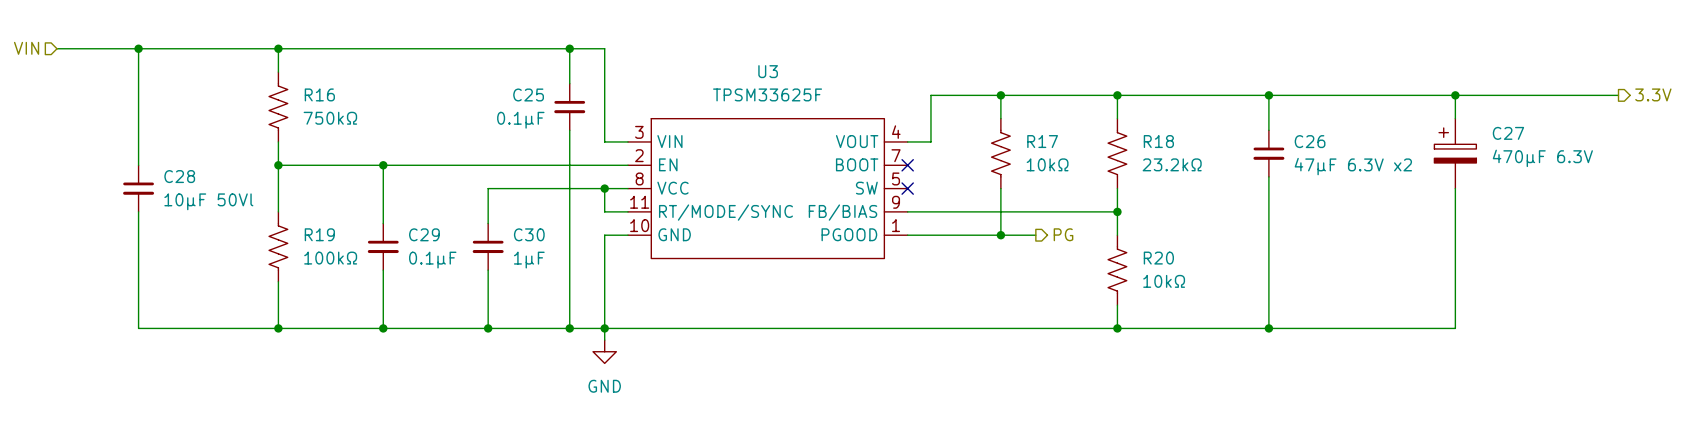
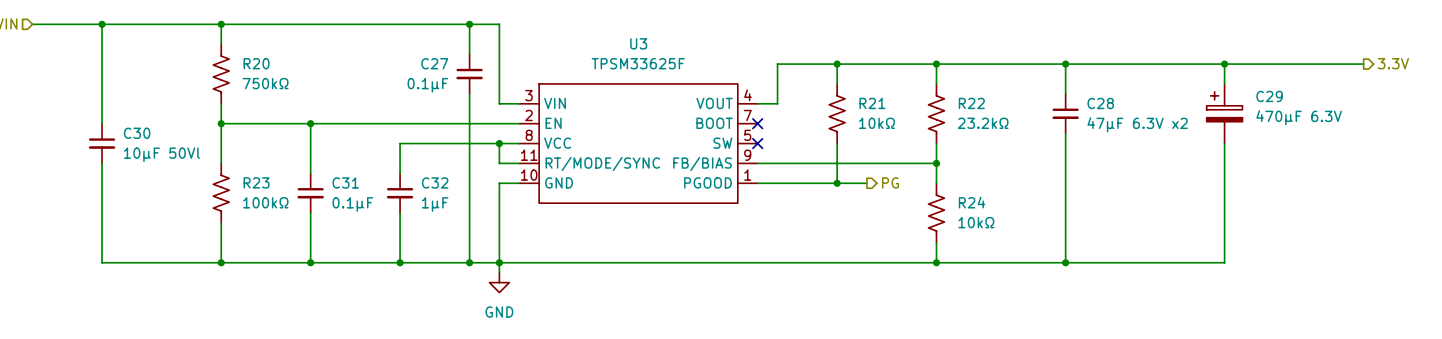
R16 name: R16 (319, 94) -> R20 (256, 63)
C25 name: C25 (528, 94) -> C27 (434, 63)
C27 name: C27 (1508, 133) -> C29 (1269, 96)
R17 name: R17 (1042, 141) -> R21 (872, 103)
R18 name: R18 (1158, 141) -> R22 (971, 103)
C26 name: C26 (1310, 141) -> C28 (1100, 103)
C28 name: C28 (179, 176) -> C30 (137, 133)
R19 name: R19 (319, 234) -> R23 (256, 182)
C29 name: C29 (424, 234) -> C31 (345, 182)
C30 name: C30 (529, 234) -> C32 (435, 182)
R20 name: R20 (1158, 258) -> R24 (972, 202)

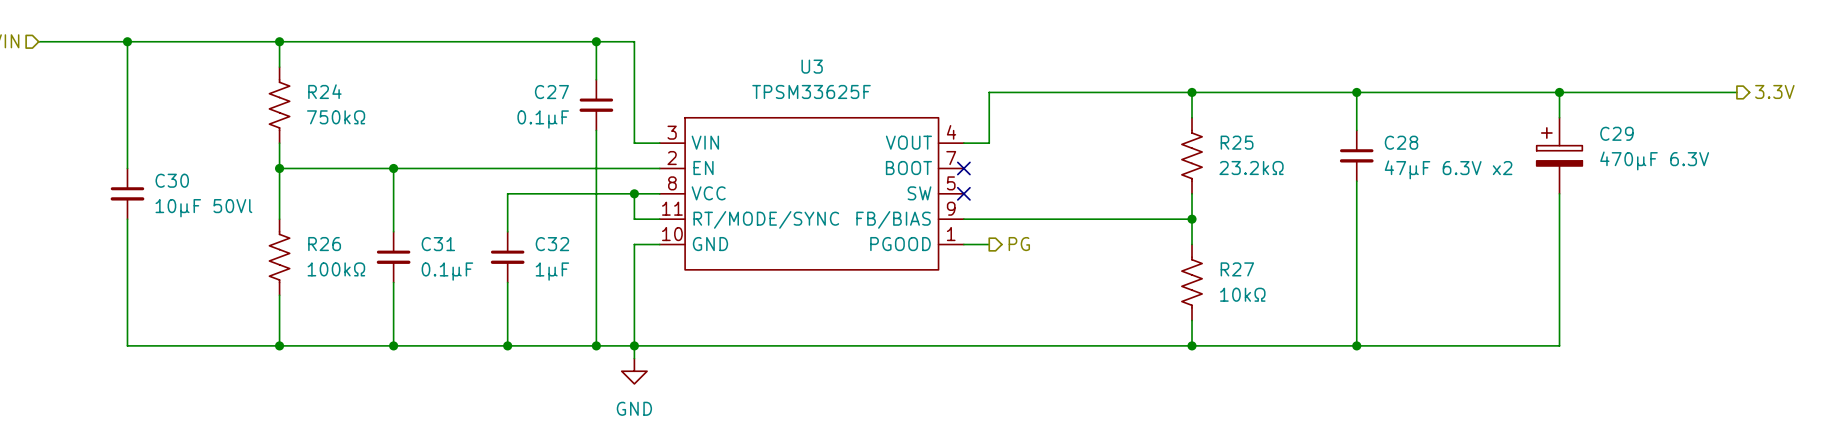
R20 name: R20 (256, 63) -> R24 (324, 91)
wire: (837, 64) (837, 83) -> none
junction: (837, 64) -> none
R22 name: R22 (971, 103) -> R25 (1237, 142)
R21: 10kΩ (837, 113) -> none
wire: (837, 143) (837, 183) -> none
R23 name: R23 (256, 182) -> R26 (324, 244)
hierarchical label position: PG (890, 182) -> PG (1019, 244)
wire: (777, 183) (866, 183) -> none
junction: (837, 183) -> none
R24 name: R24 (972, 202) -> R27 (1237, 269)

